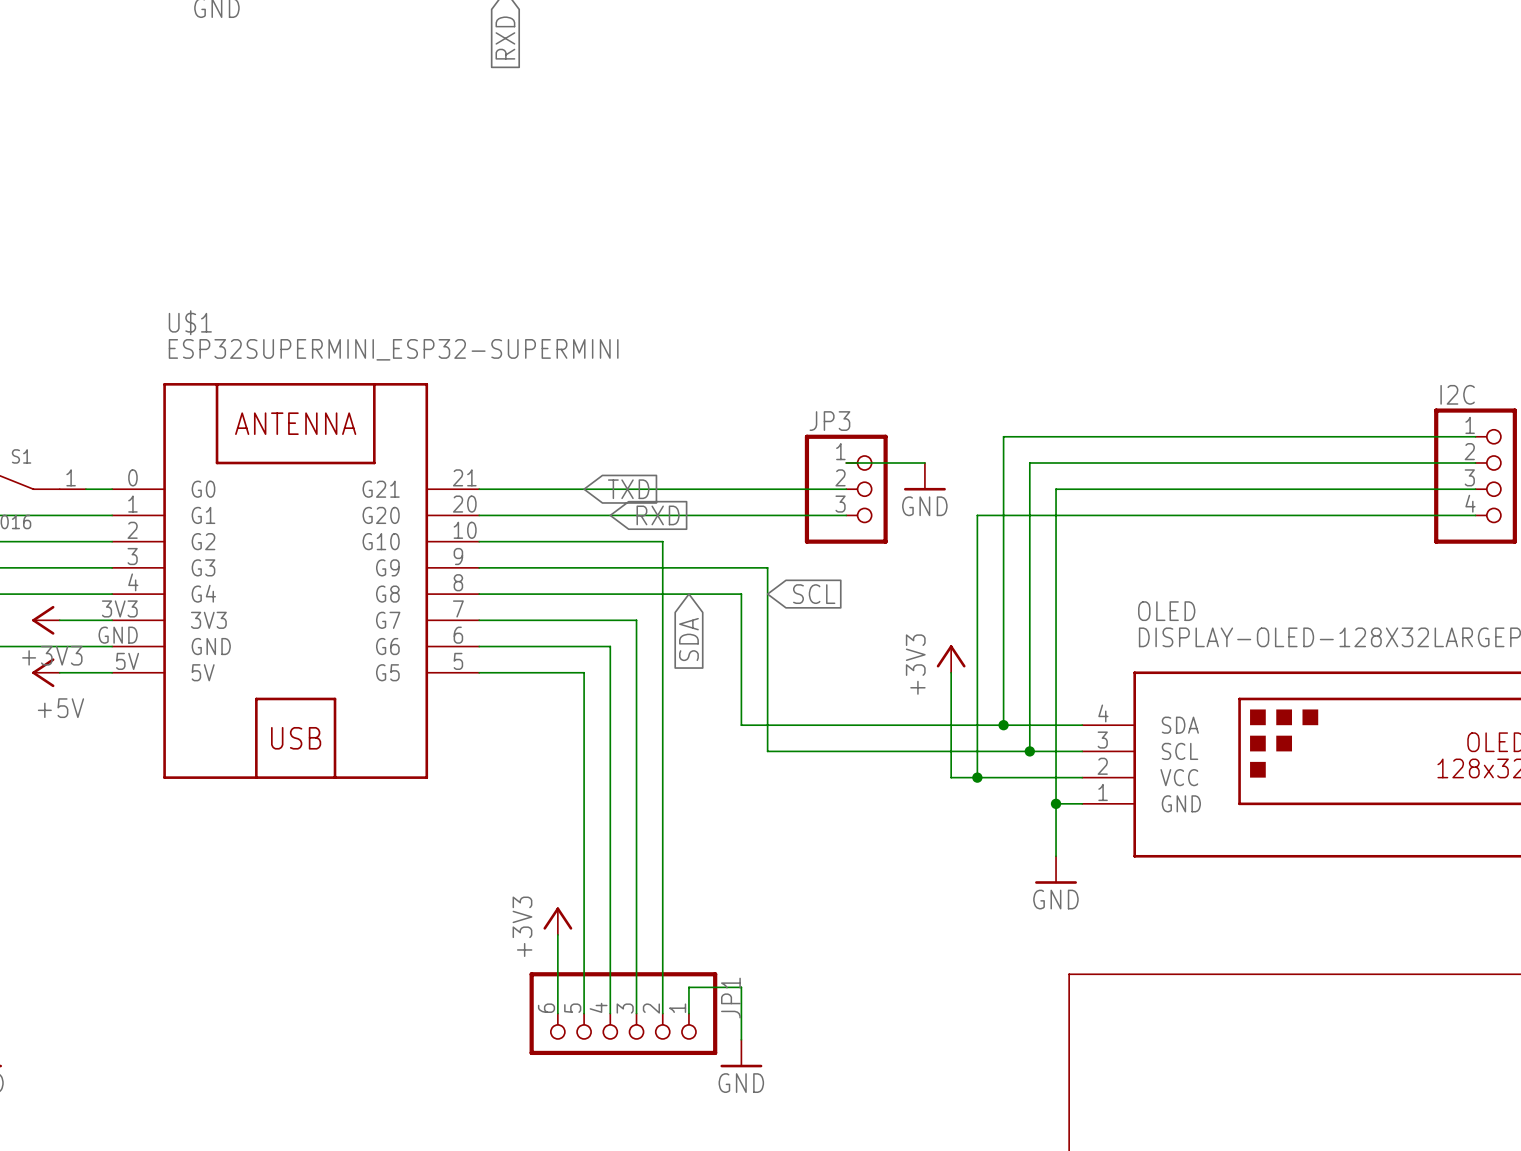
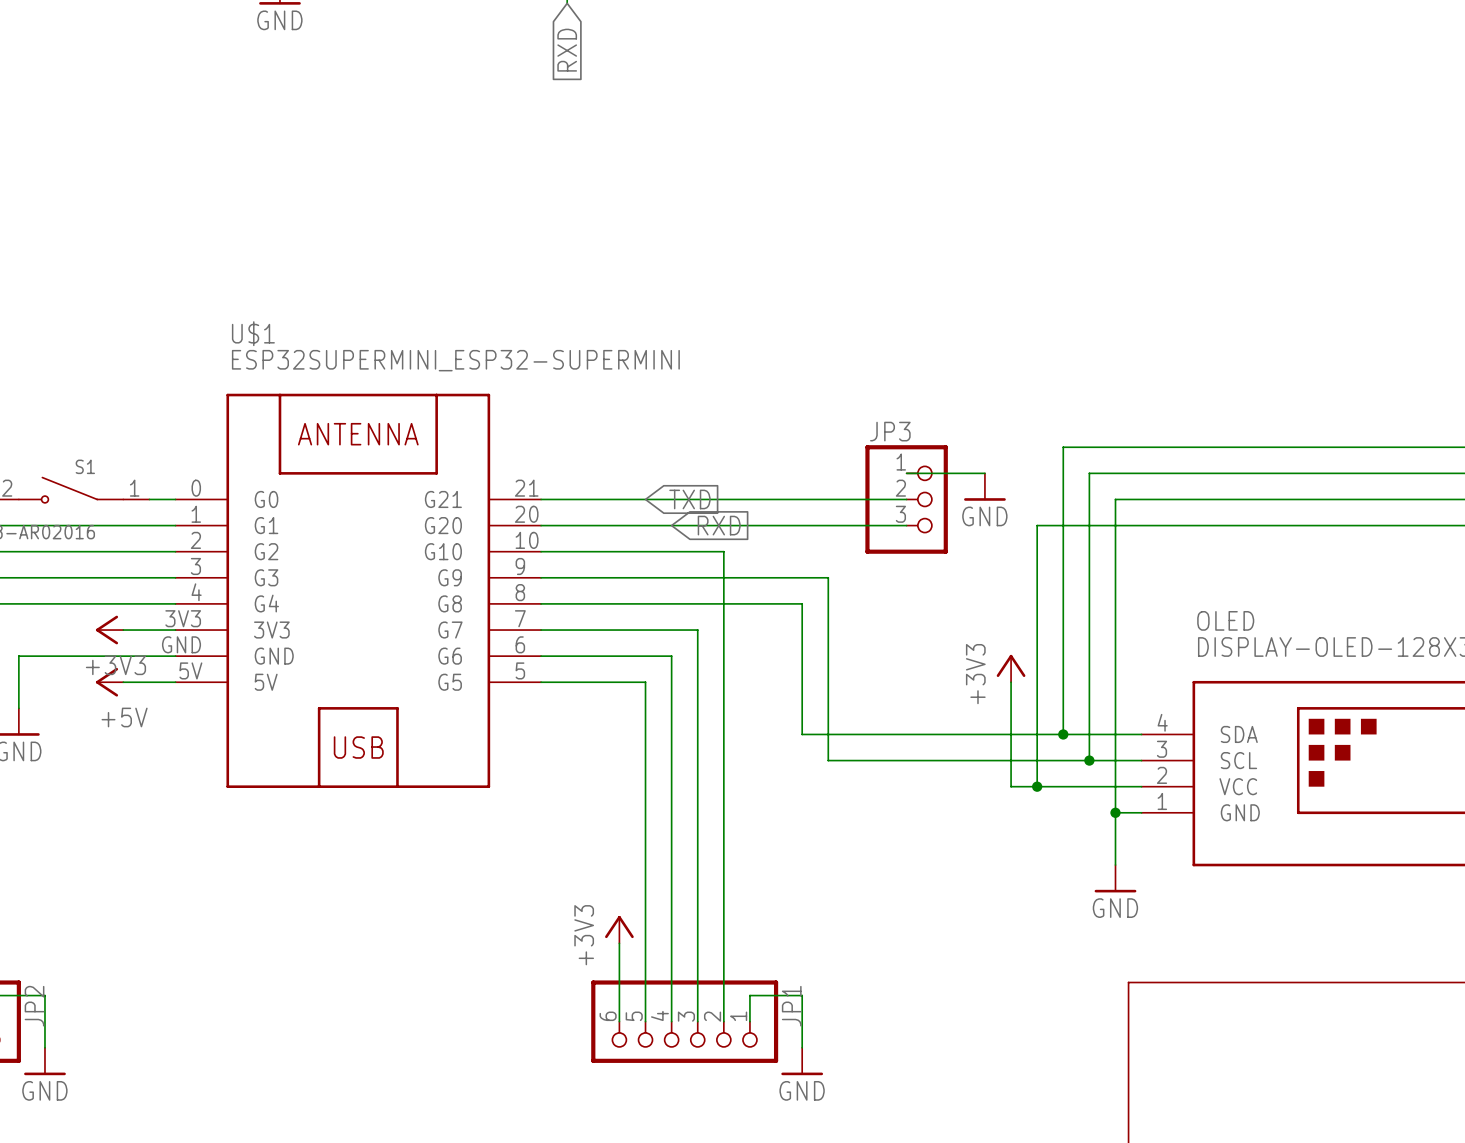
global label: SCL (814, 594) -> none
global label: SDA (688, 639) -> none

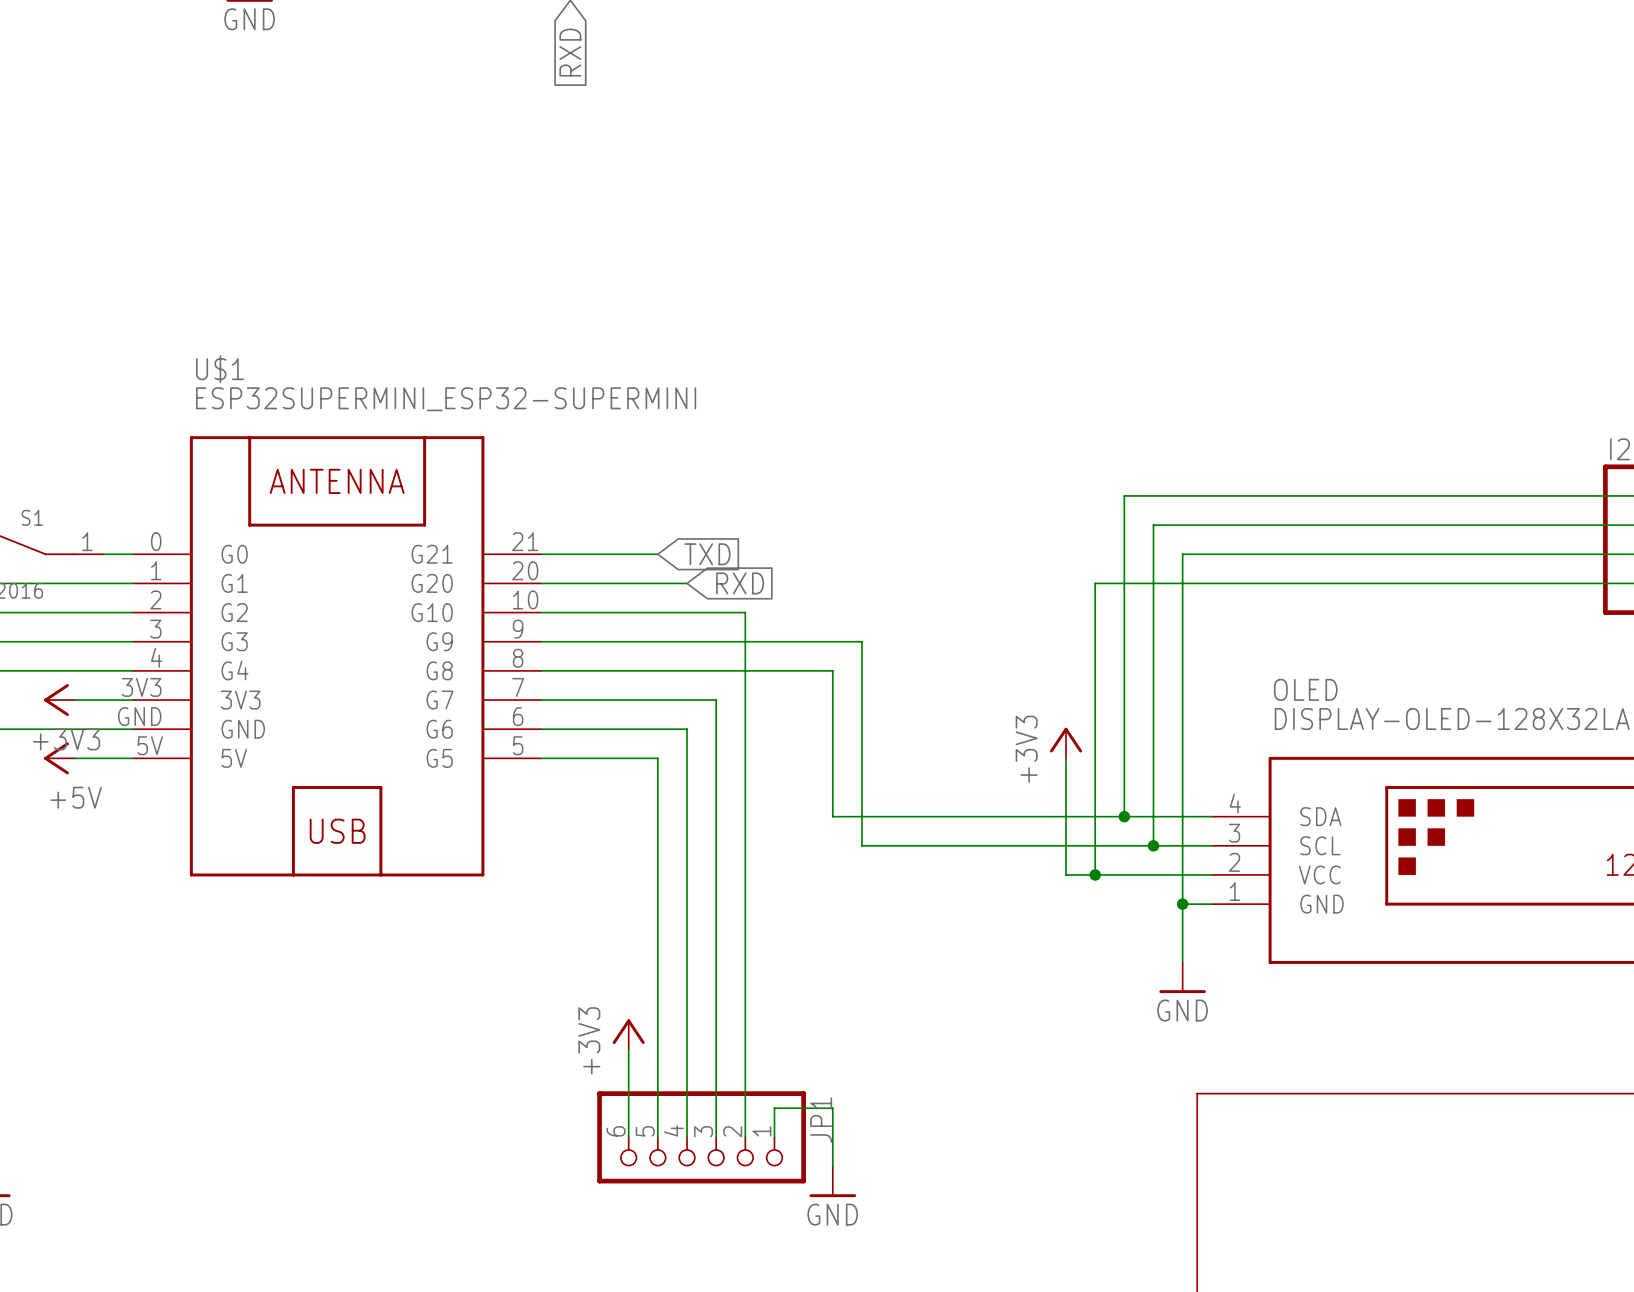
wire: (906, 473) (984, 473) -> none
power symbol: GND (984, 487) -> none
wire: (645, 499) (906, 499) -> none
JP3: (906, 499) -> none
wire: (671, 525) (906, 525) -> none

